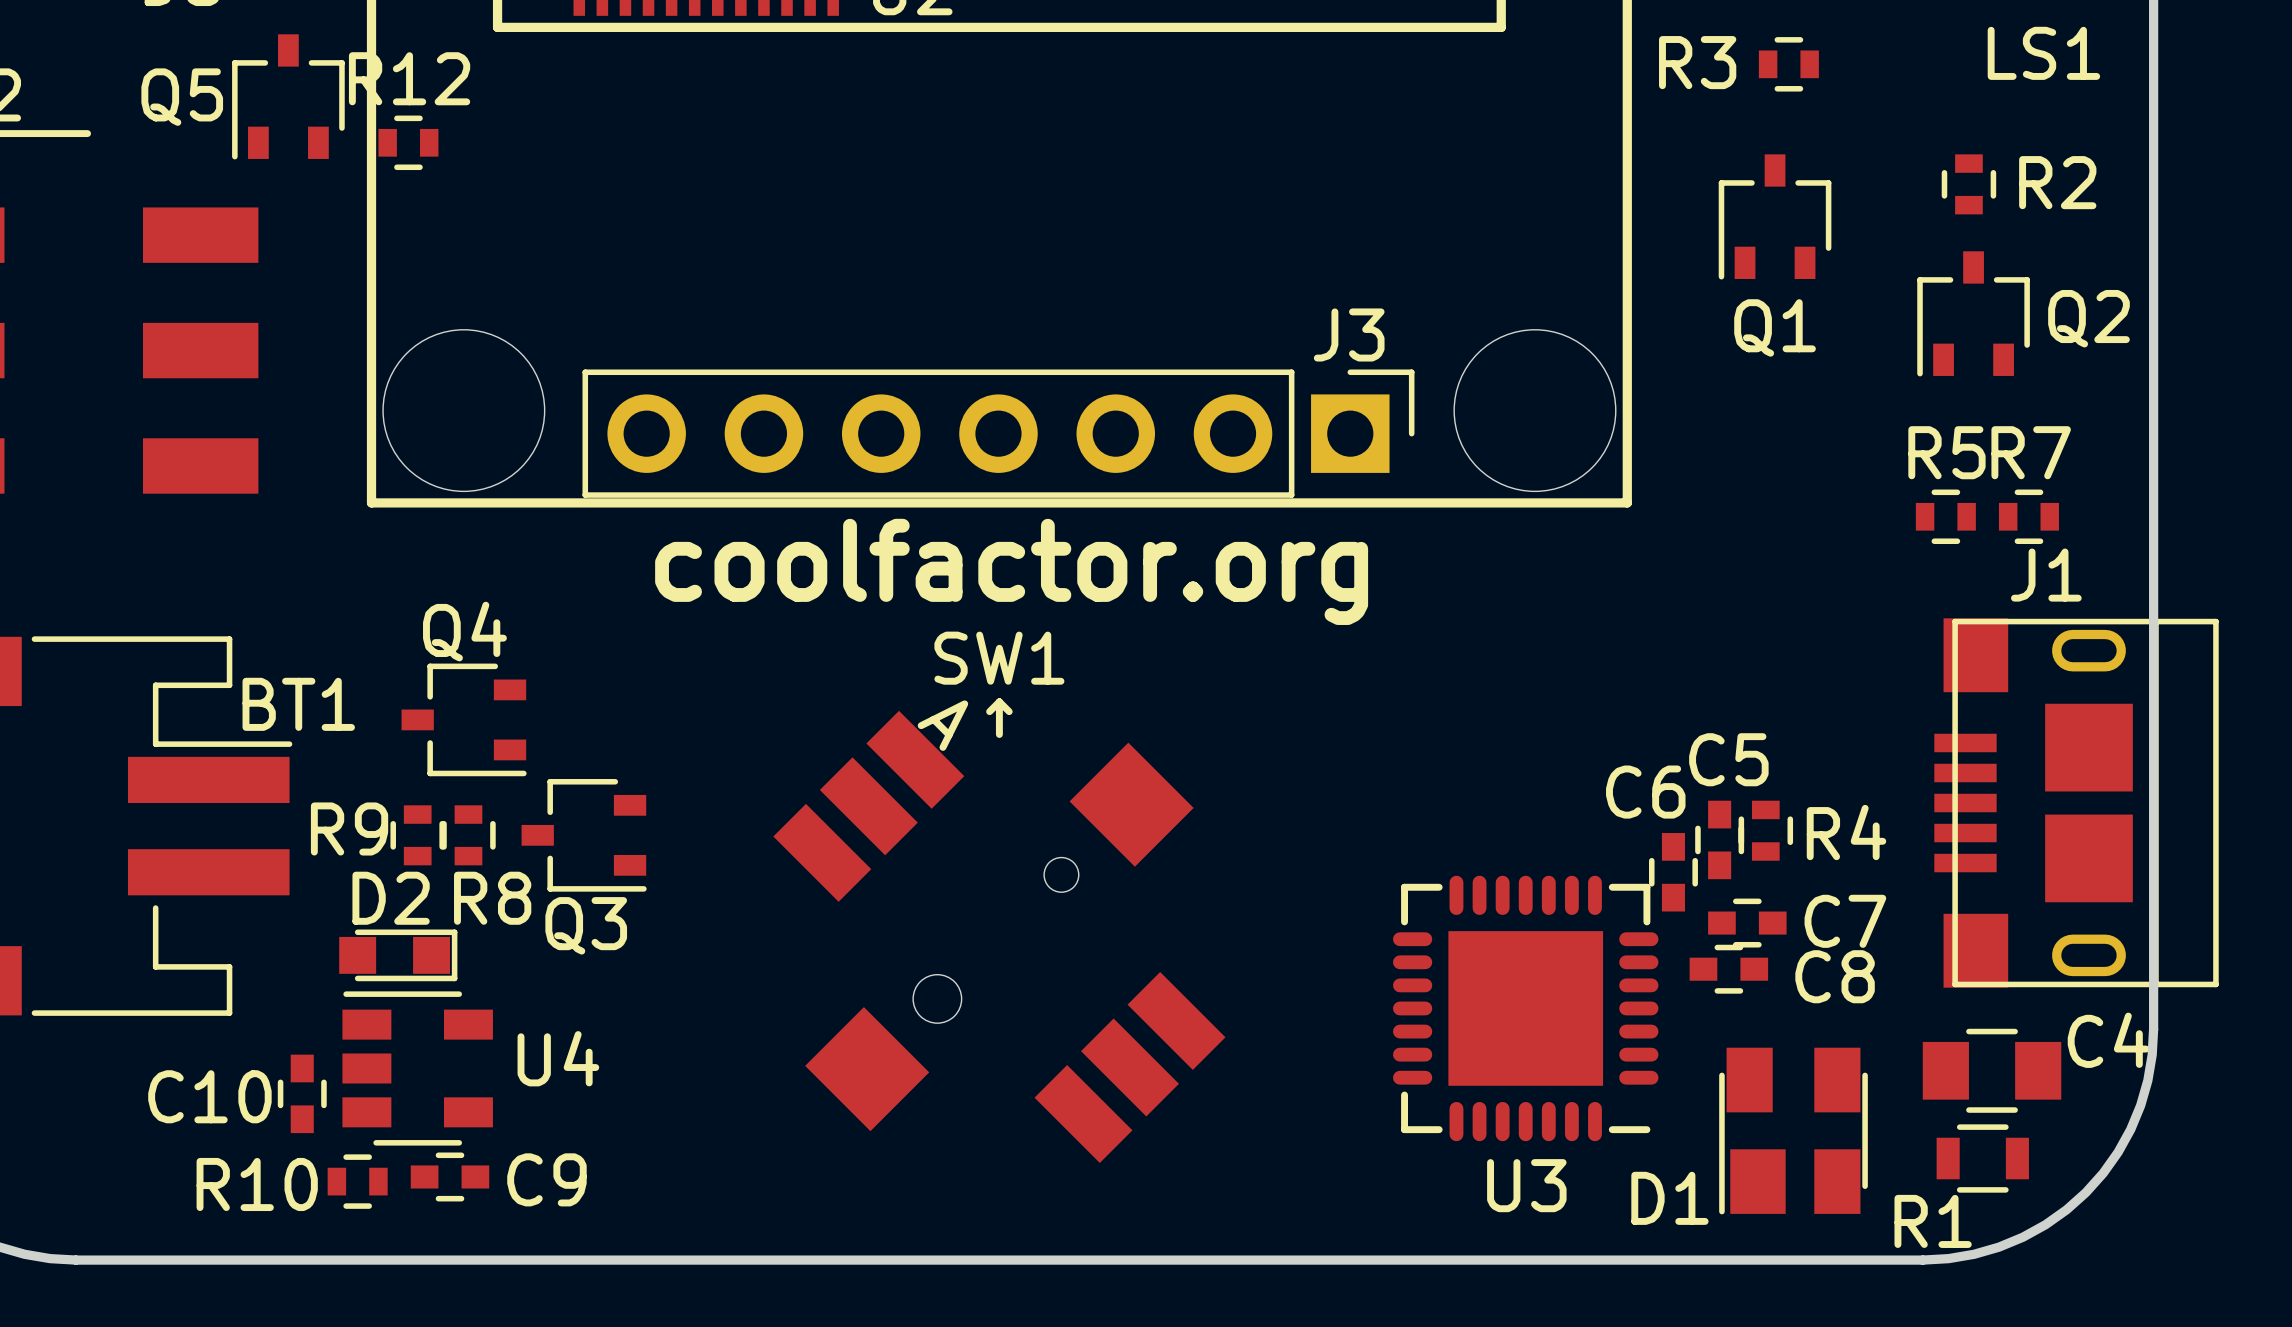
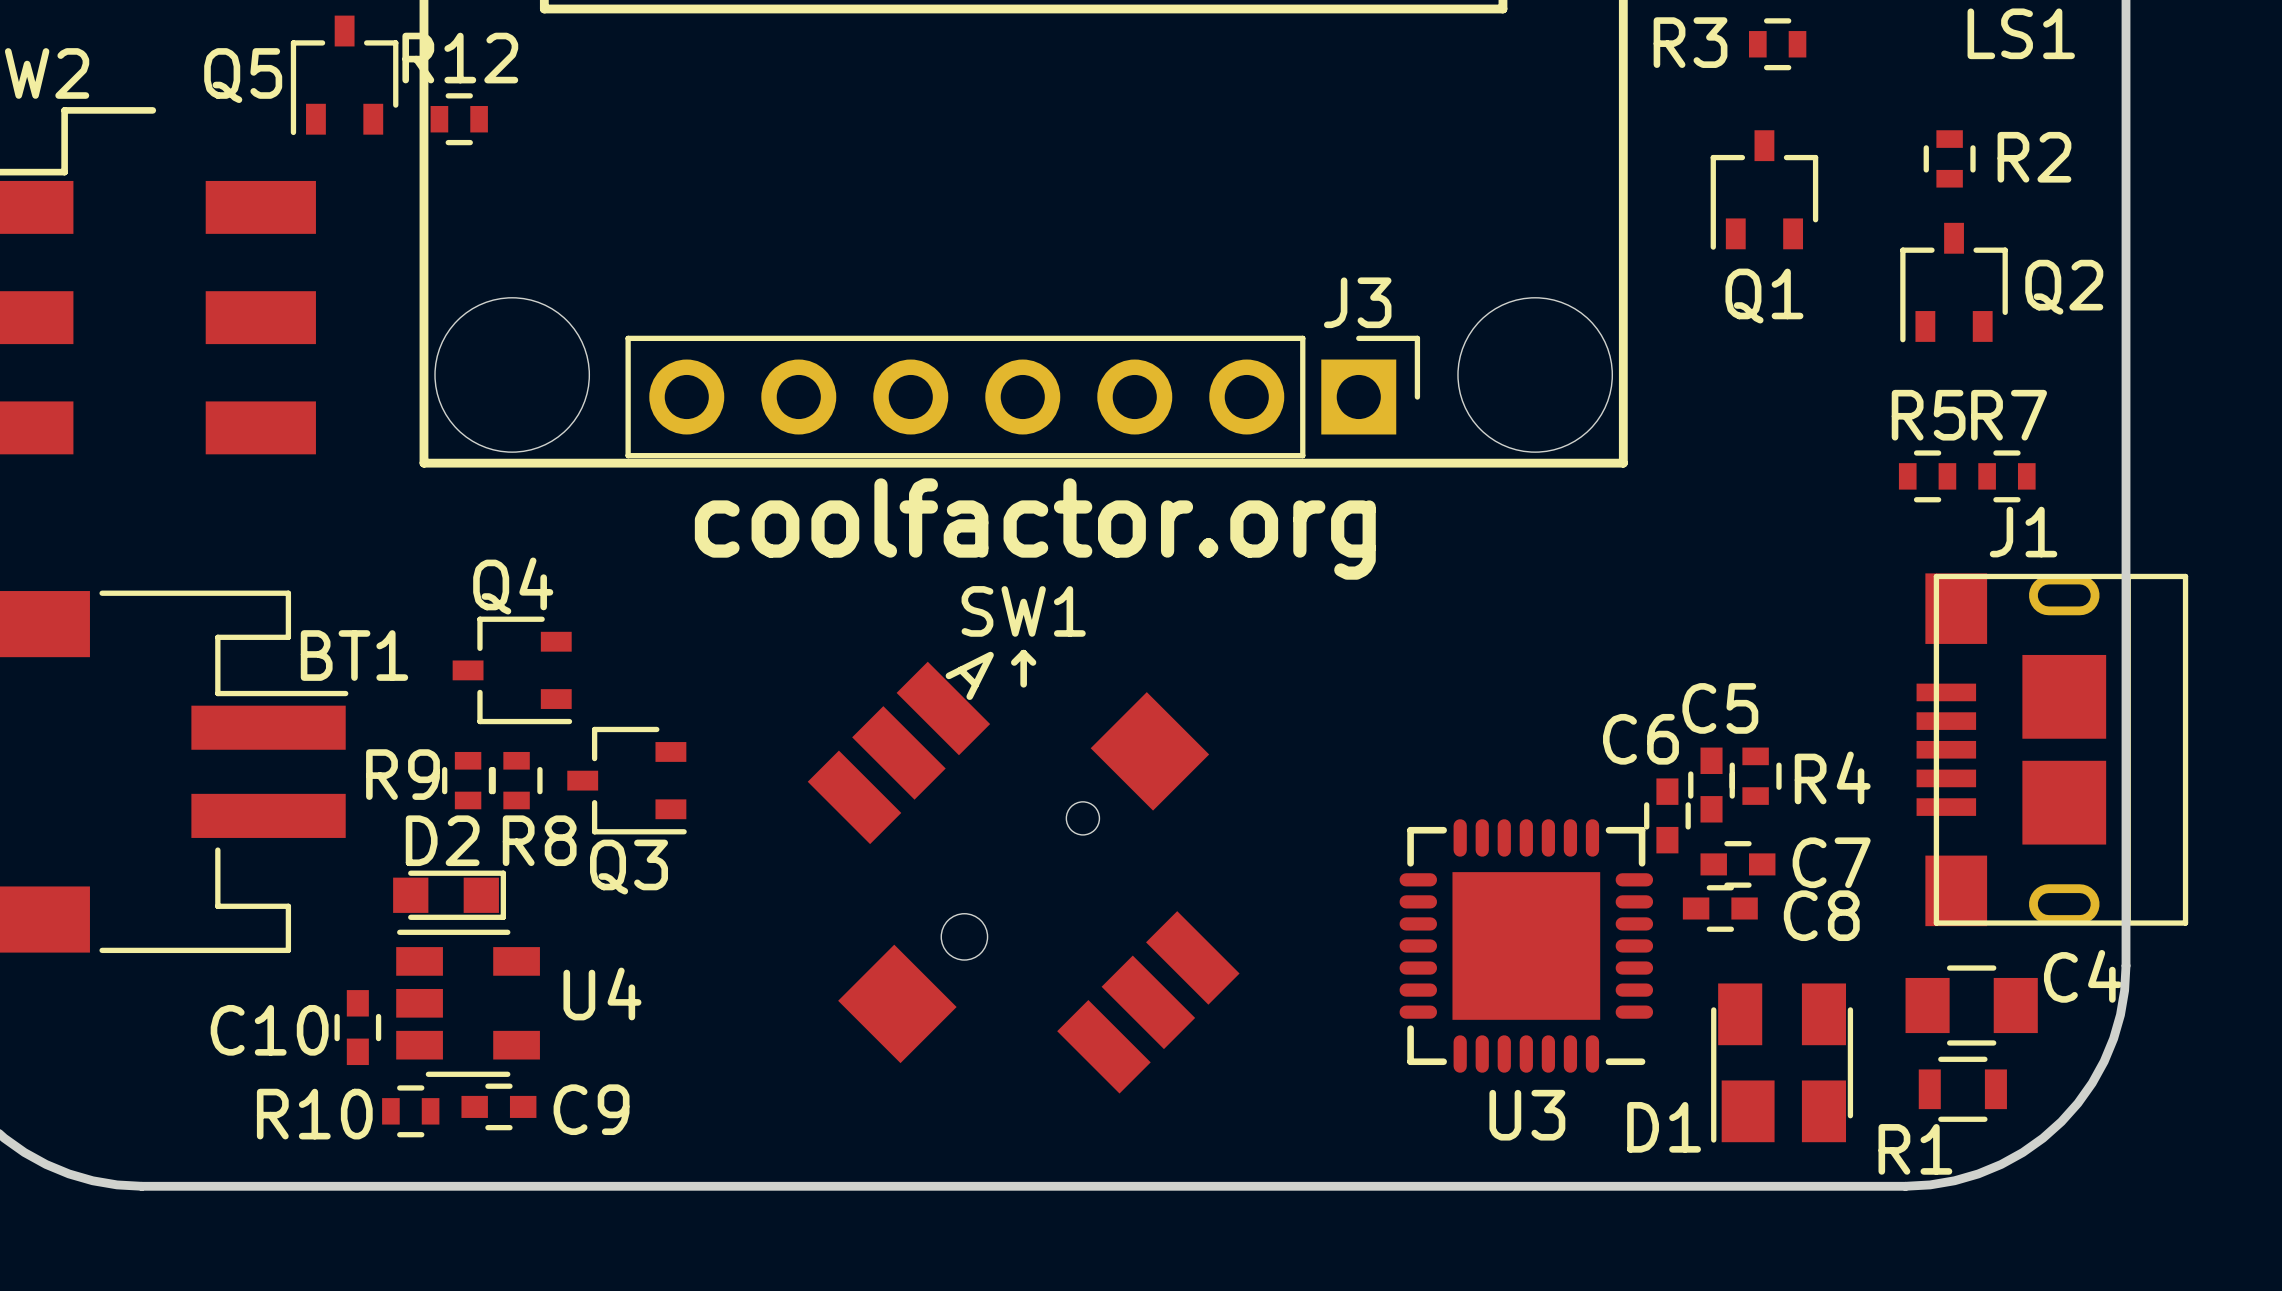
J1 footprint: [1934, 618, 2219, 988] -> [1916, 573, 2189, 927]

